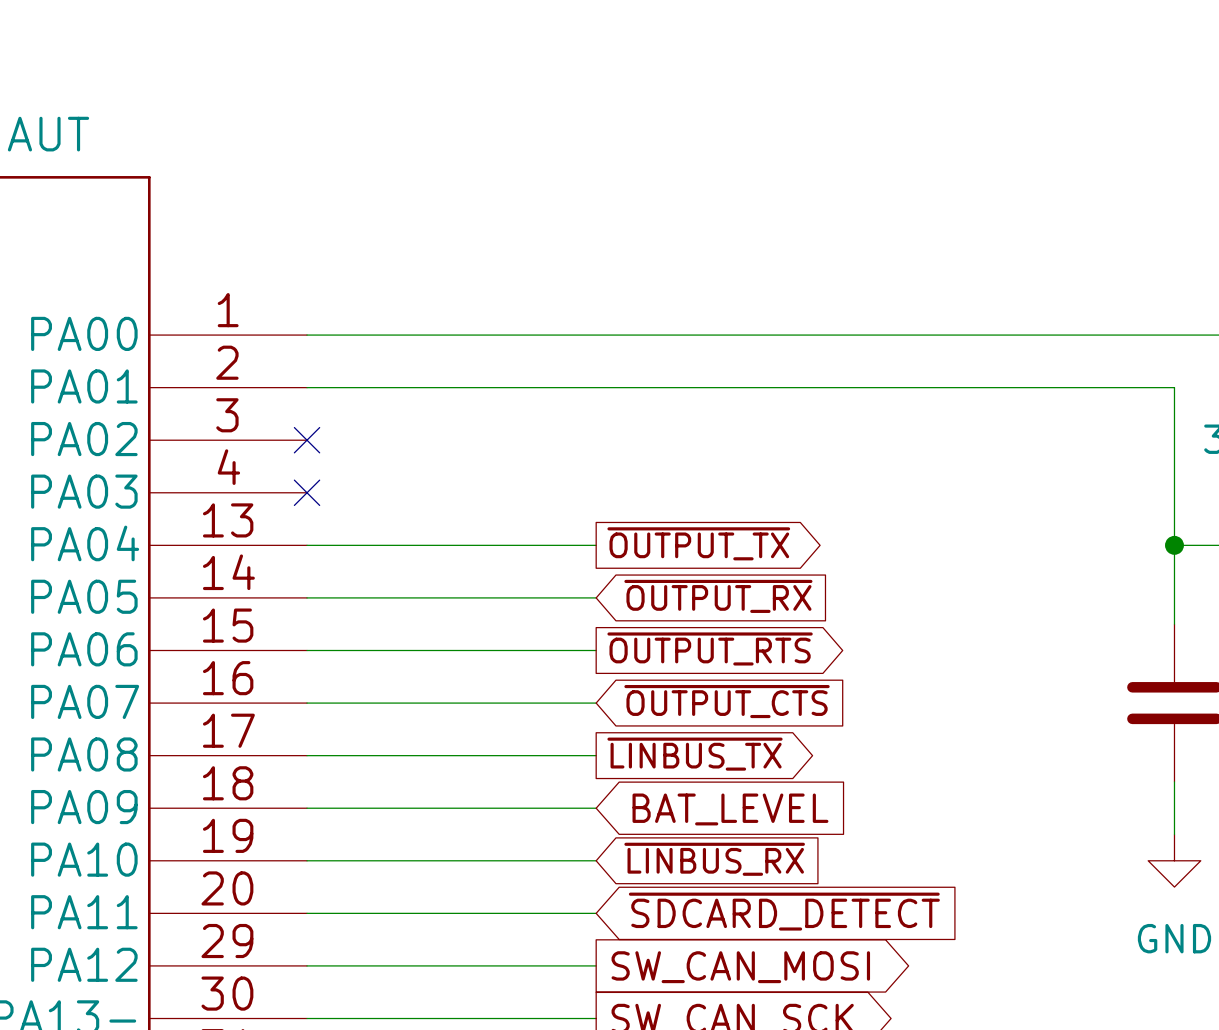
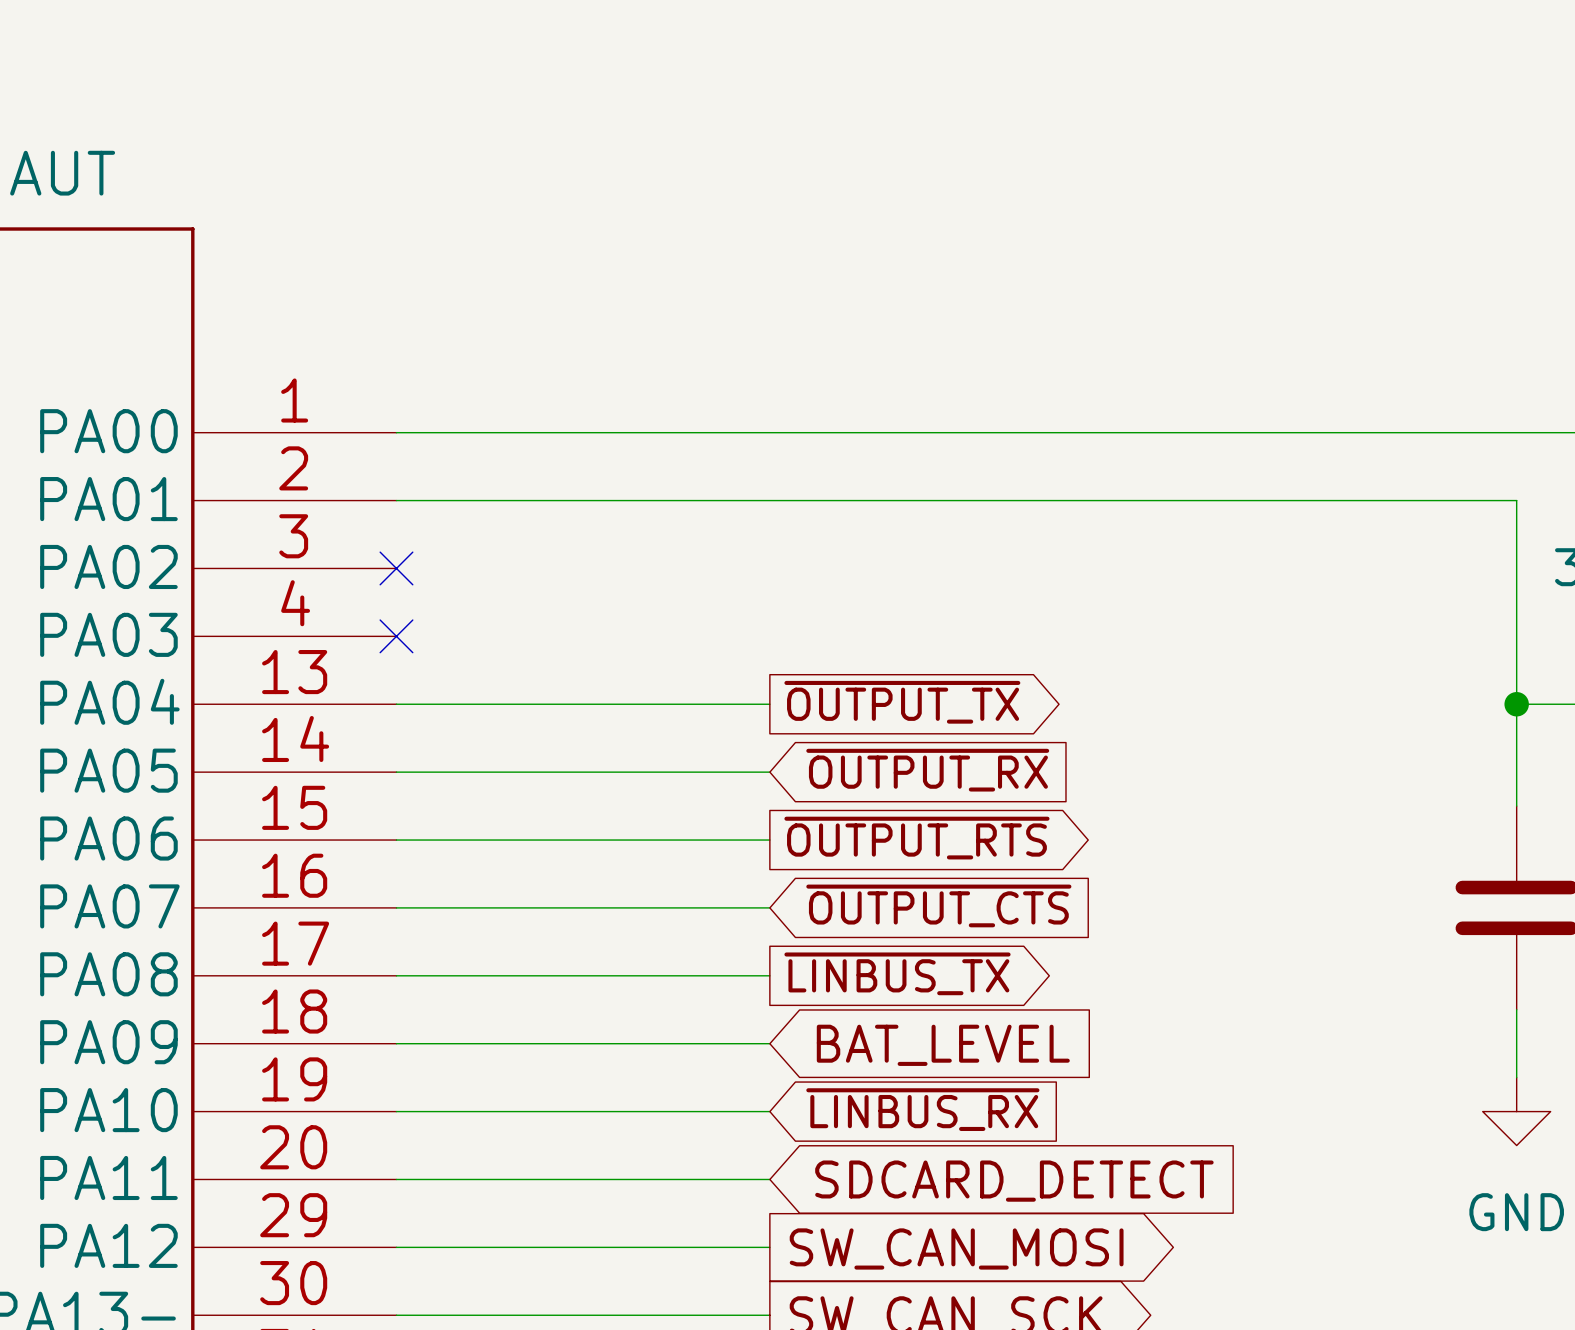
global label: ~{SDCARD_DETECT} (784, 911) -> SDCARD_DETECT (1014, 1181)

